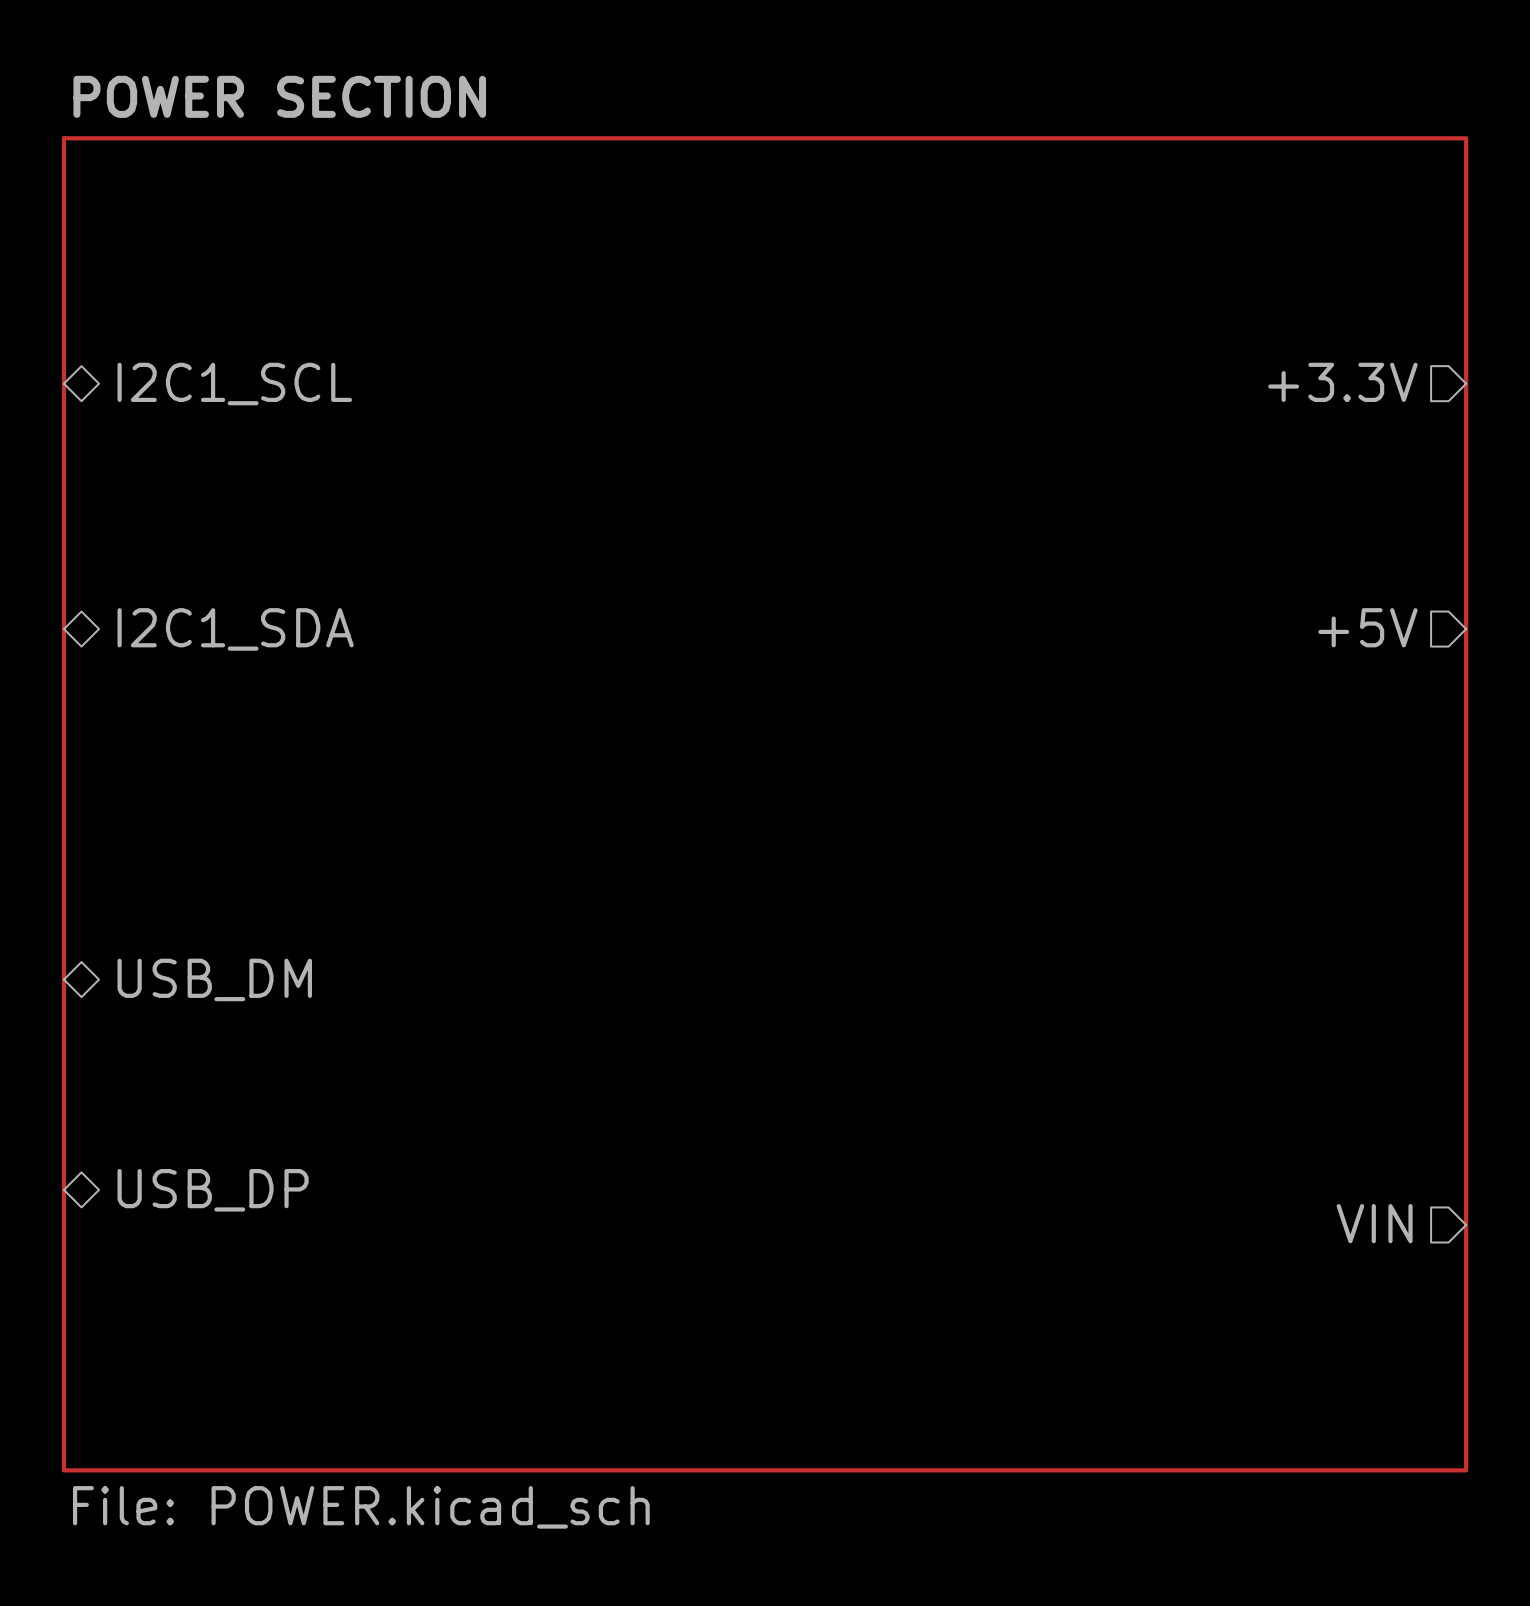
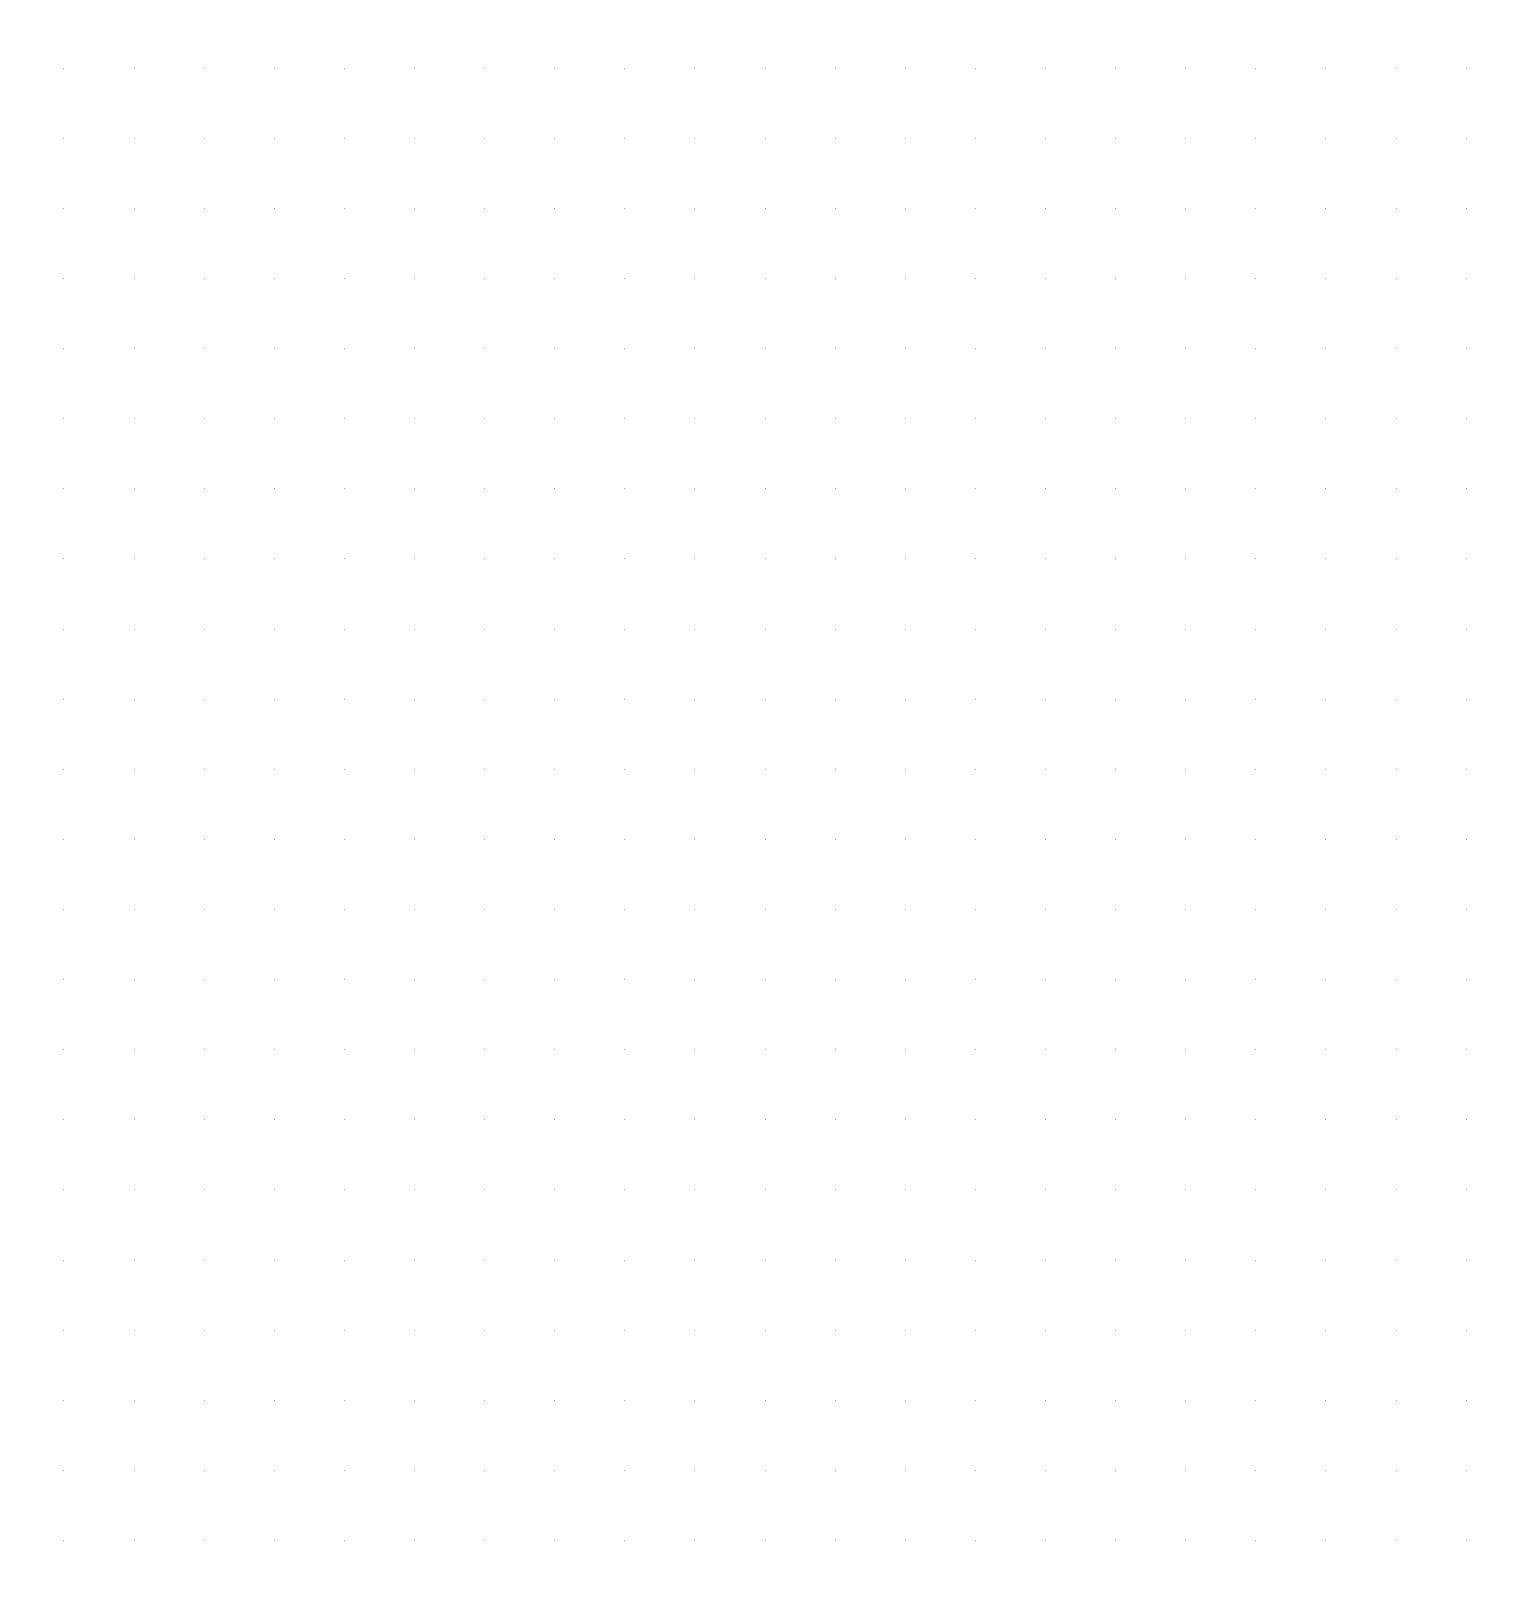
sheet pin: +3.3V (1342, 382) -> none
sheet pin: I2C1_SCL (234, 384) -> none
sheet pin: +5V (1367, 627) -> none
sheet pin: I2C1_SDA (235, 629) -> none
sheet POWER SECTION: File: POWER.kicad_sch (765, 804) -> none
sheet pin: USB_DM (214, 979) -> none
sheet pin: USB_DP (213, 1190) -> none
sheet pin: VIN (1374, 1223) -> none

